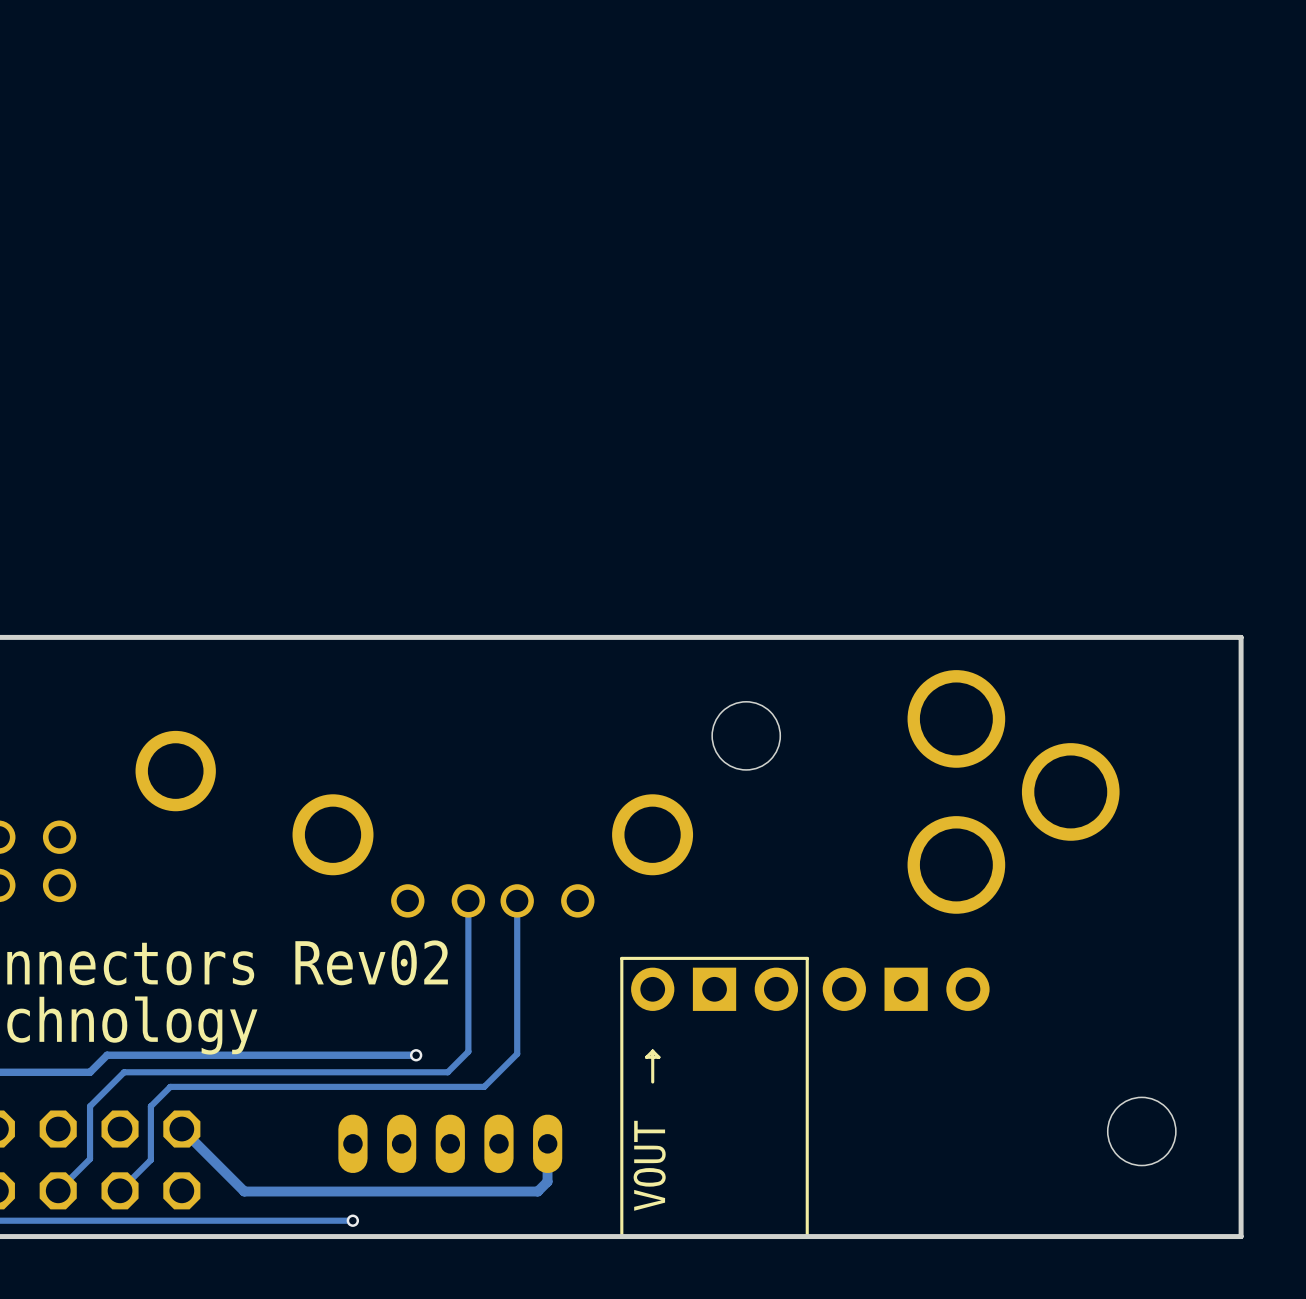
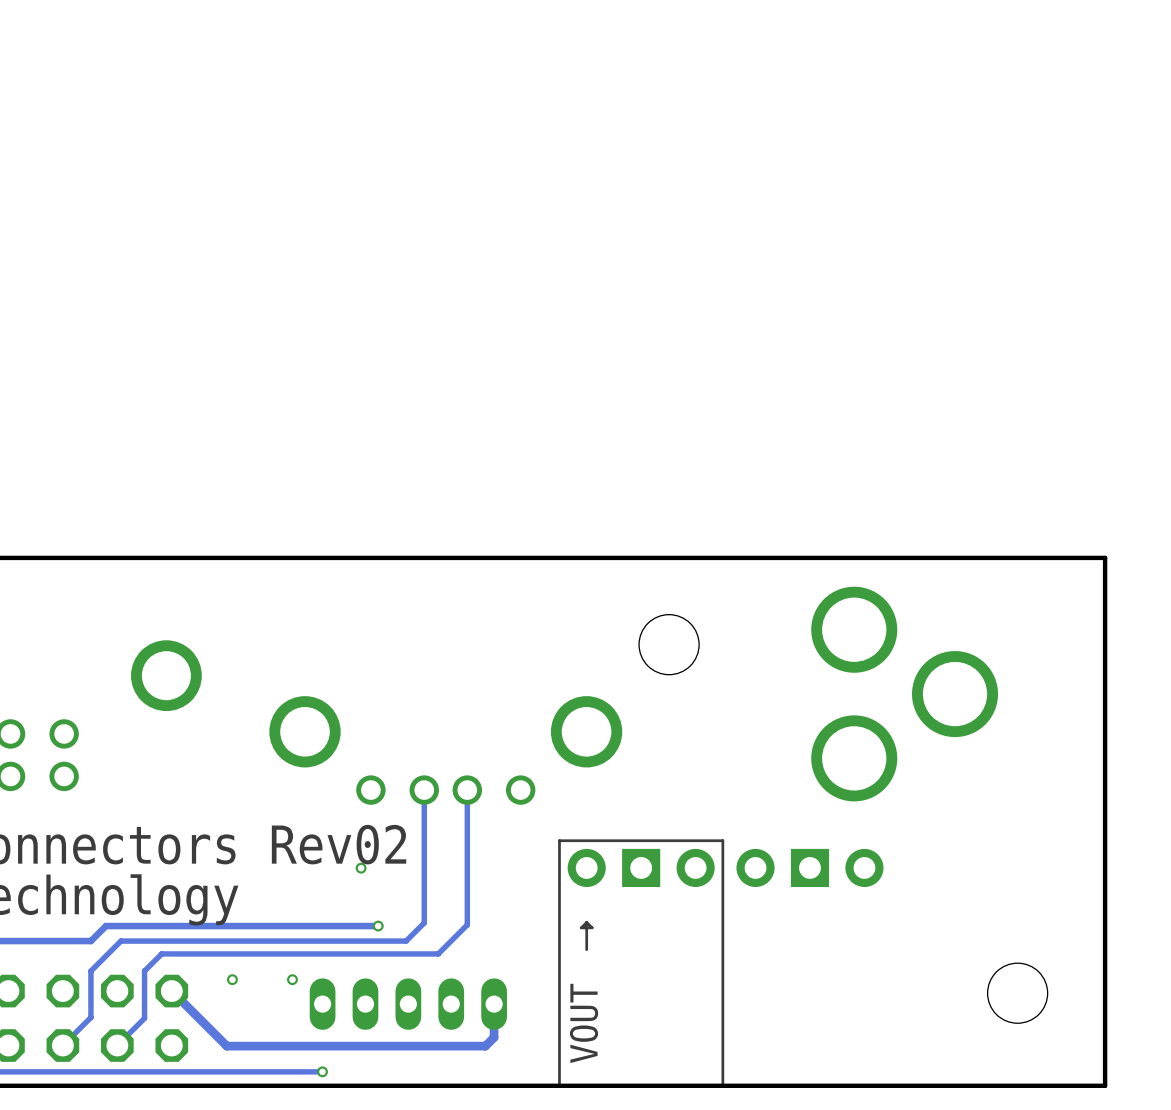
via: none -> (361, 868)
via: none -> (232, 979)
via: none -> (292, 979)

